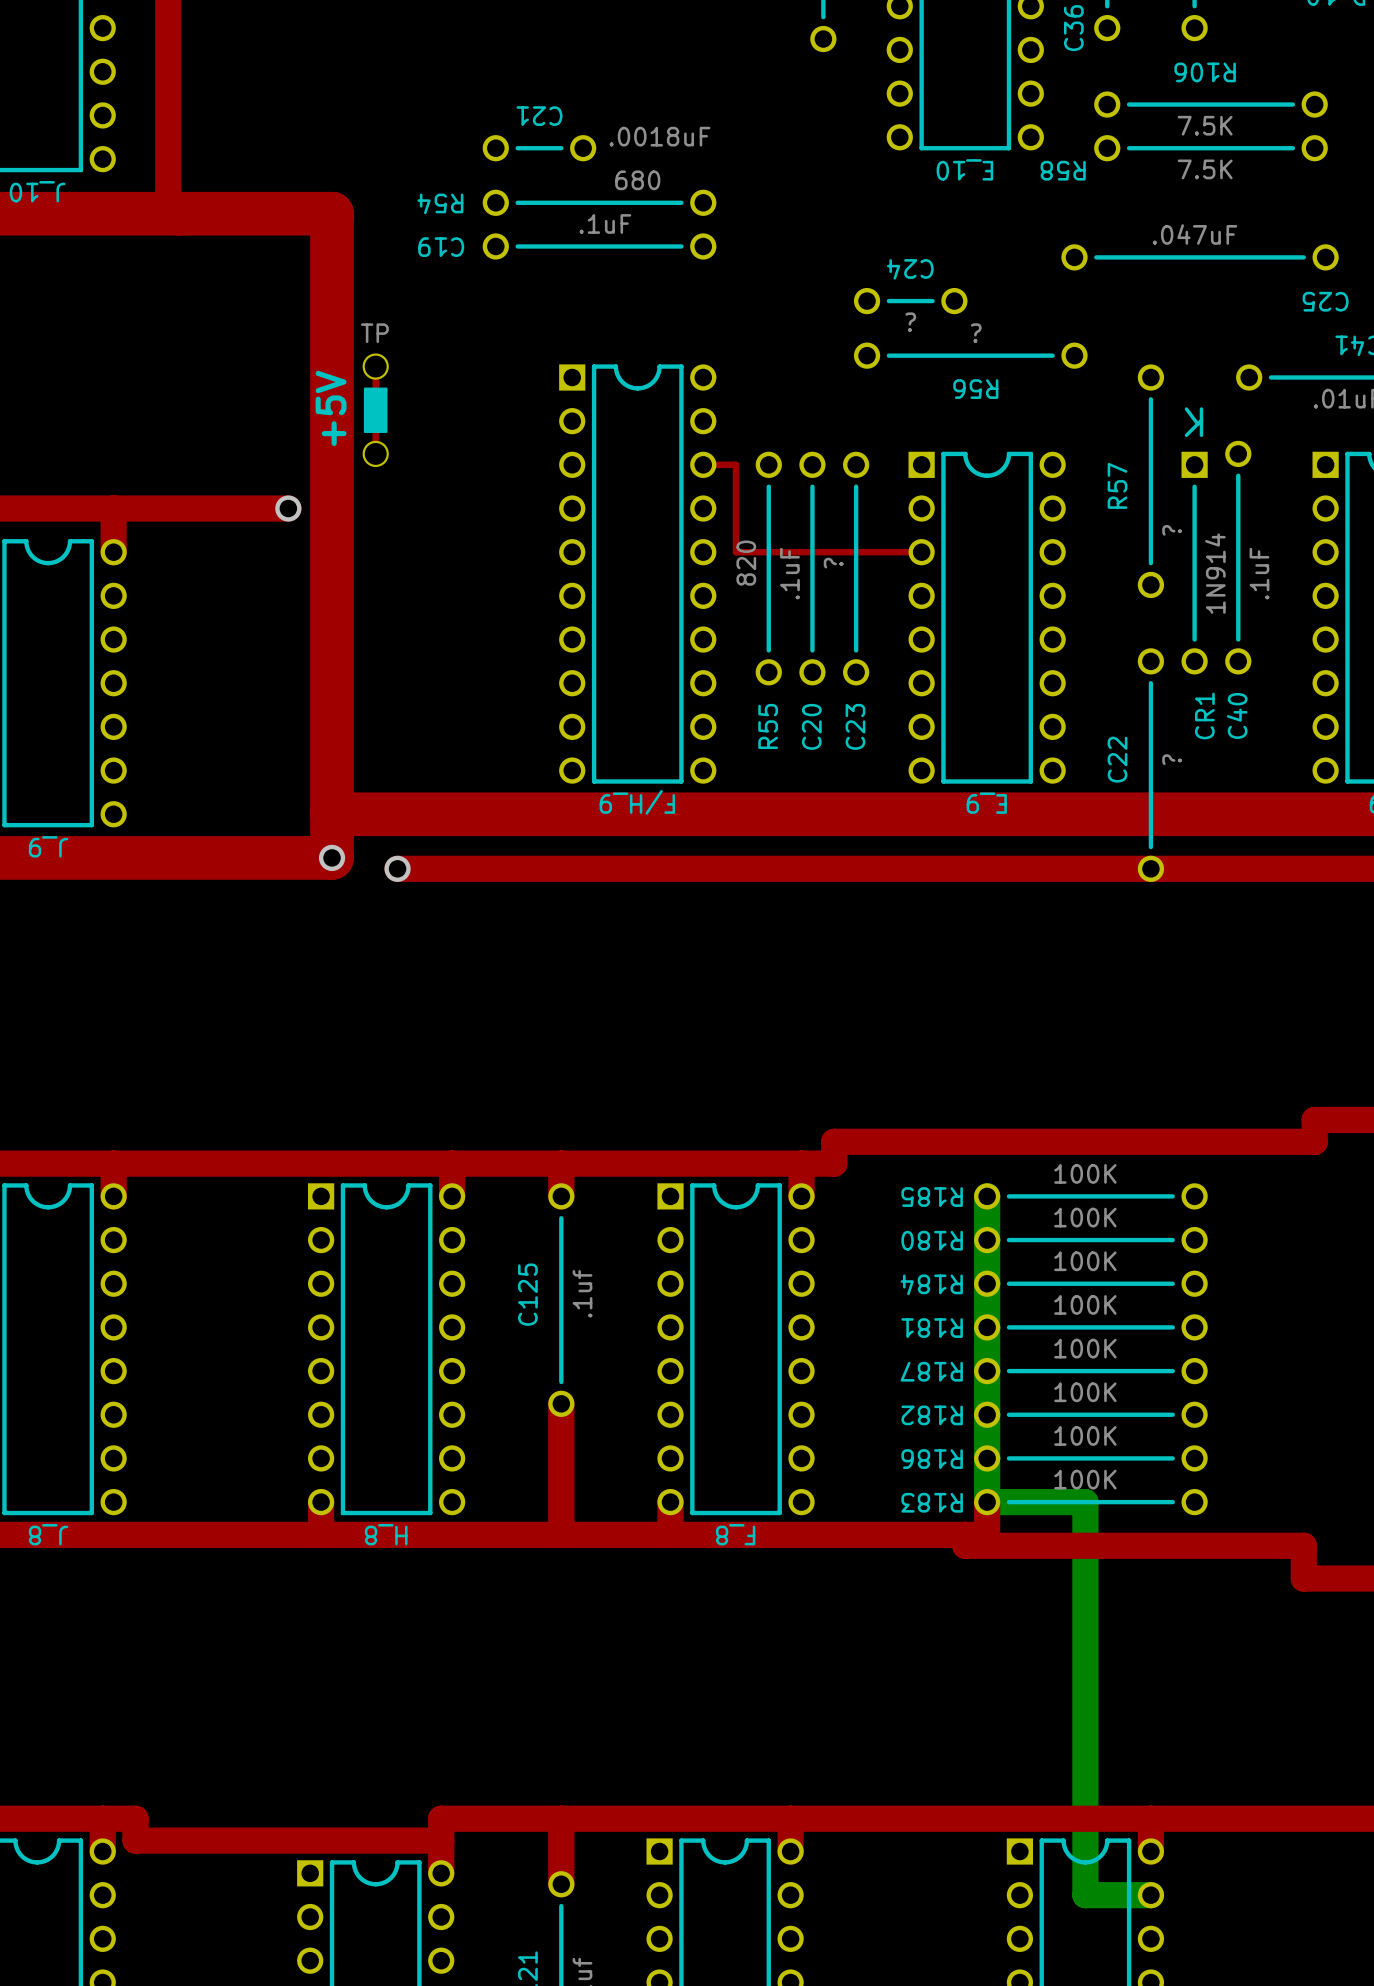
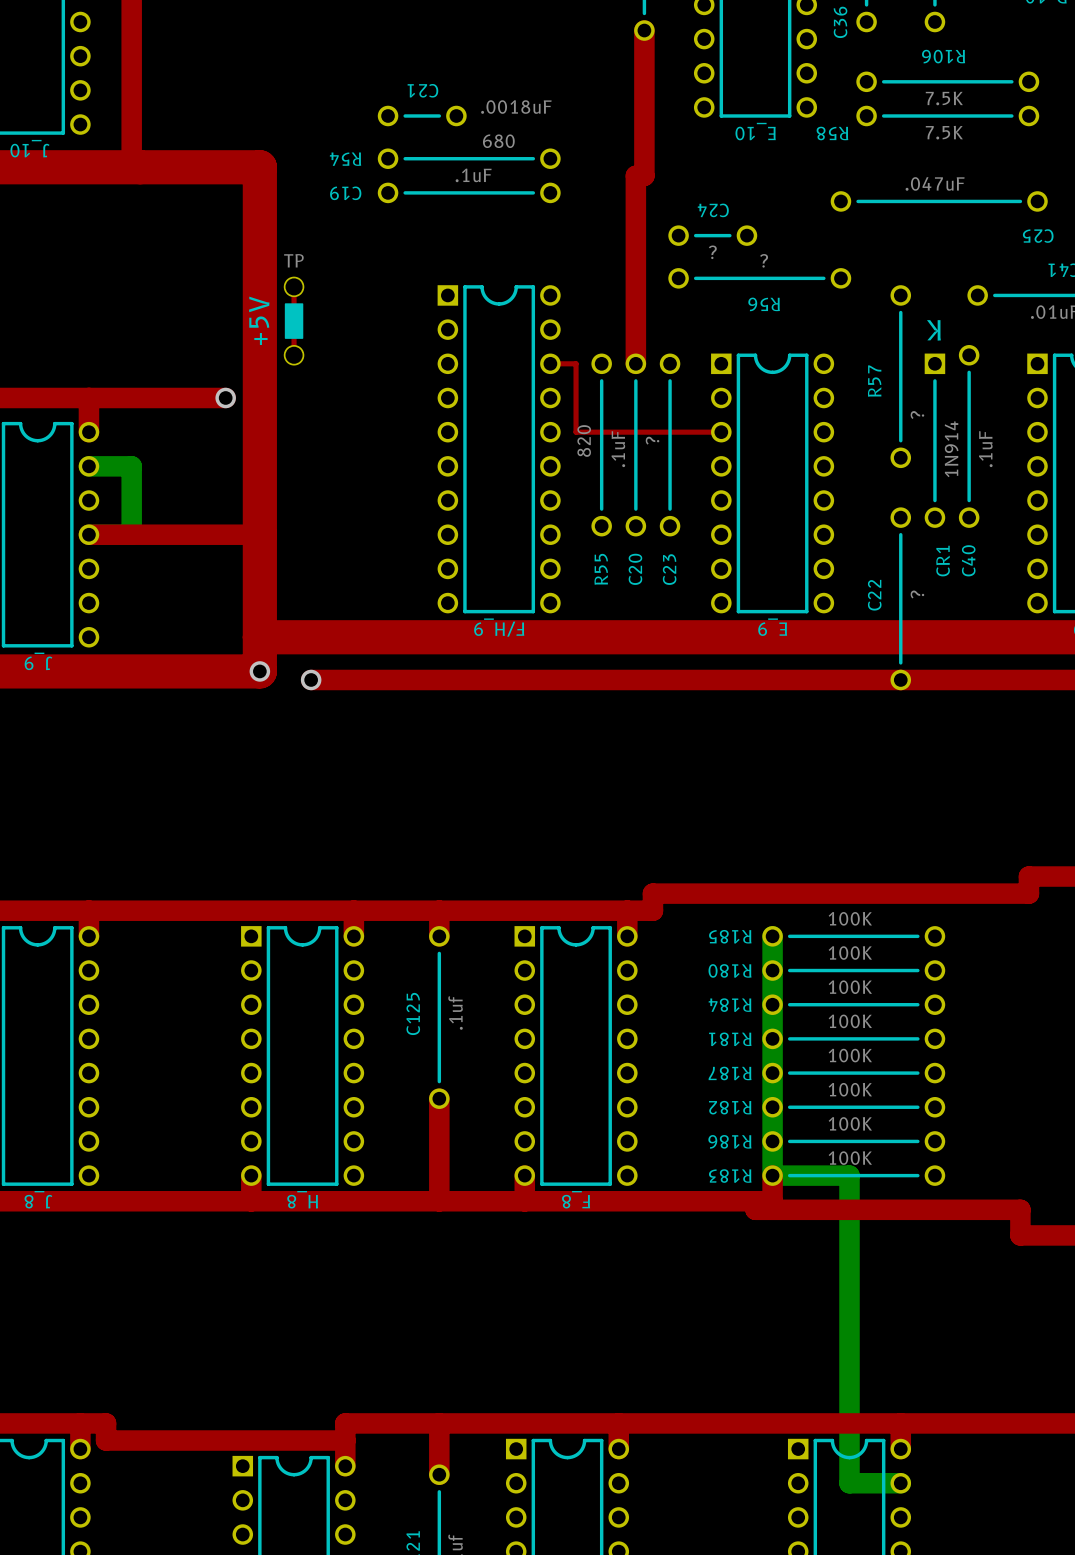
top track: none -> (644, 30) (644, 175) (635, 175) (635, 363)
bottom track: none -> (88, 466) (131, 466) (131, 534) (88, 534)
top track: none -> (88, 534) (259, 534)

